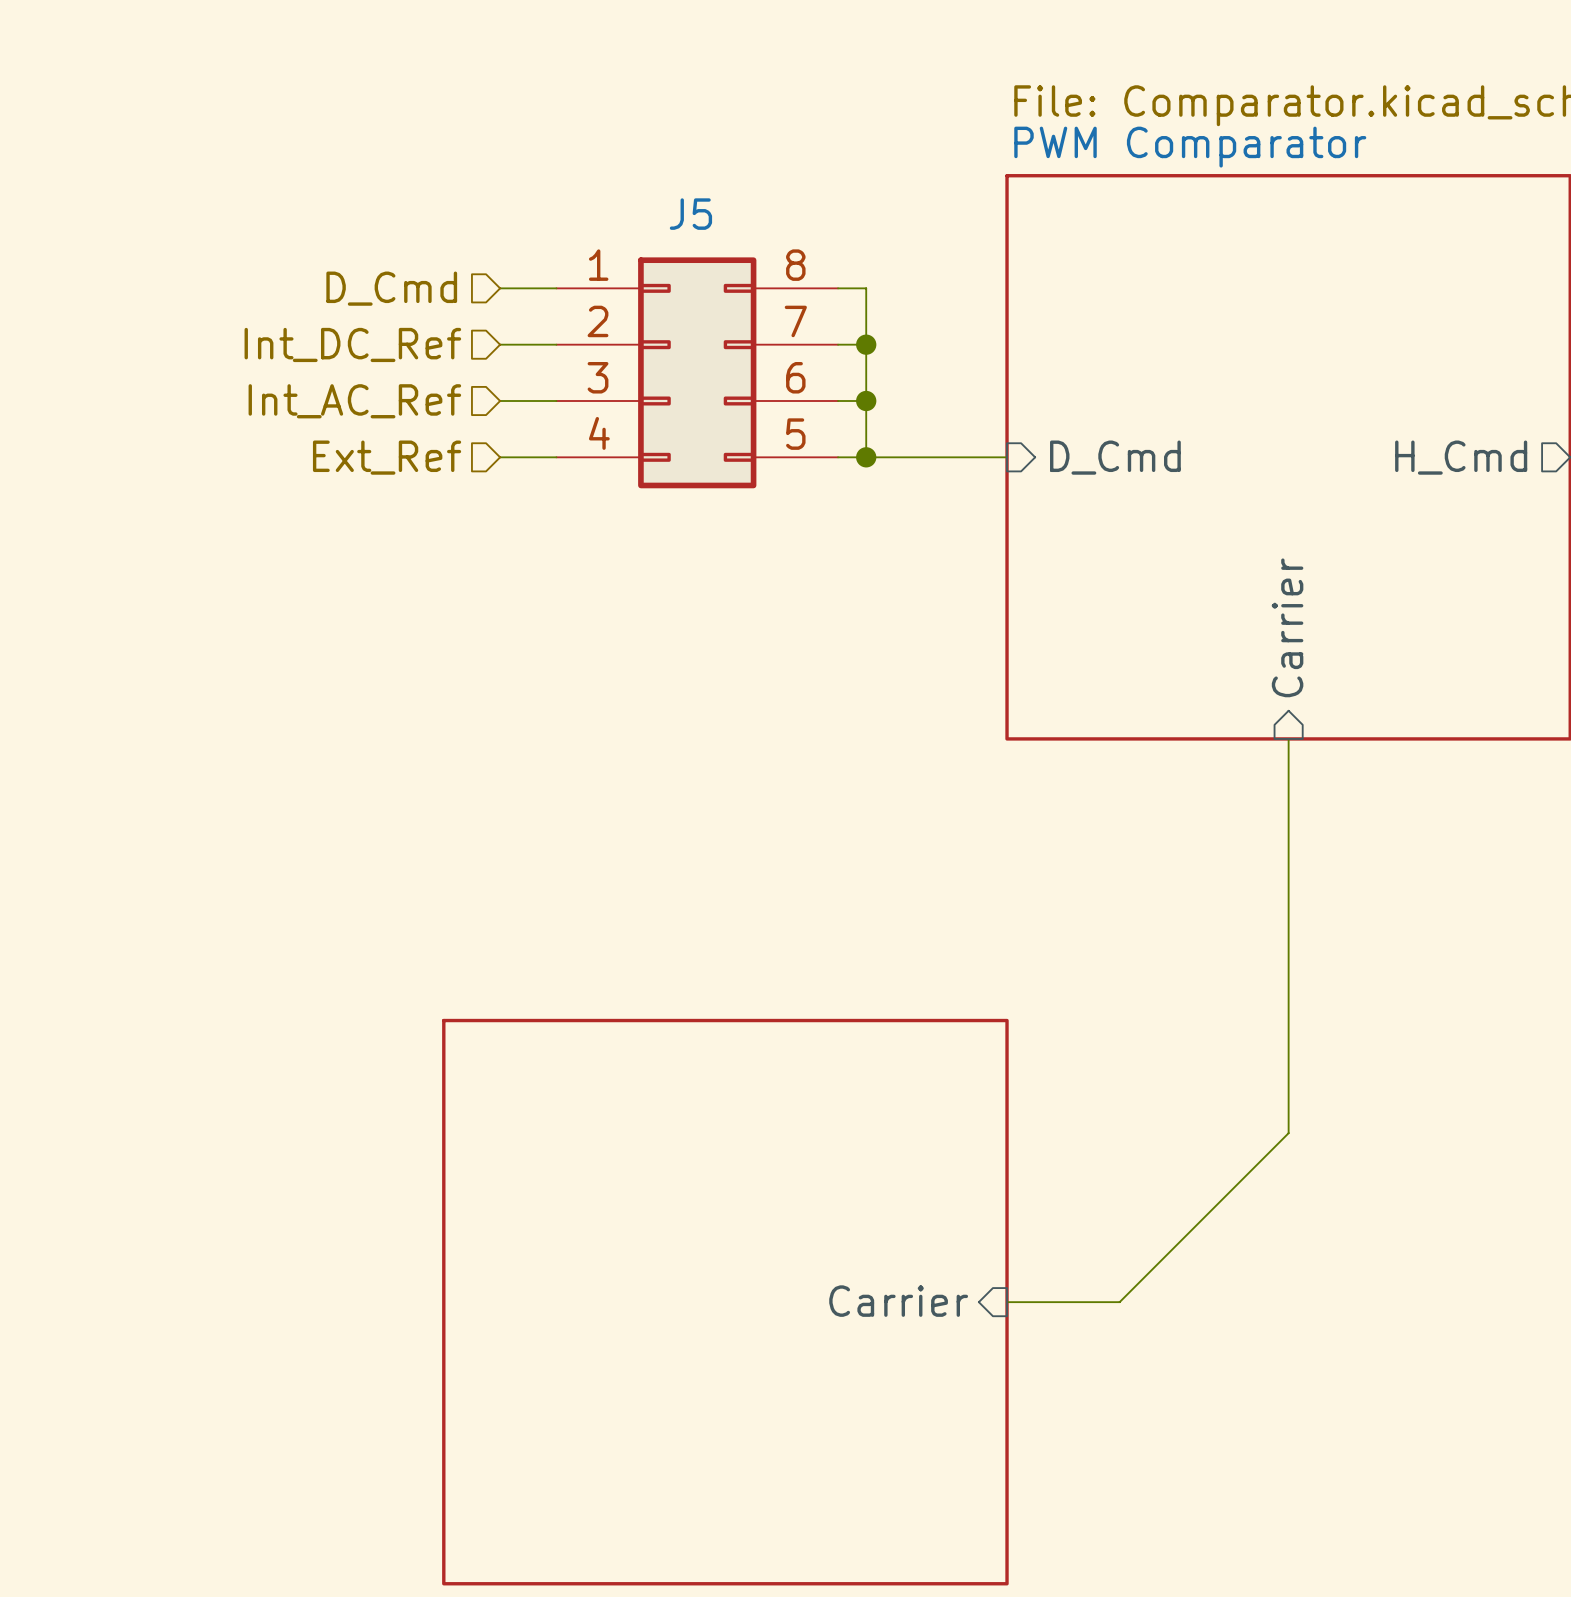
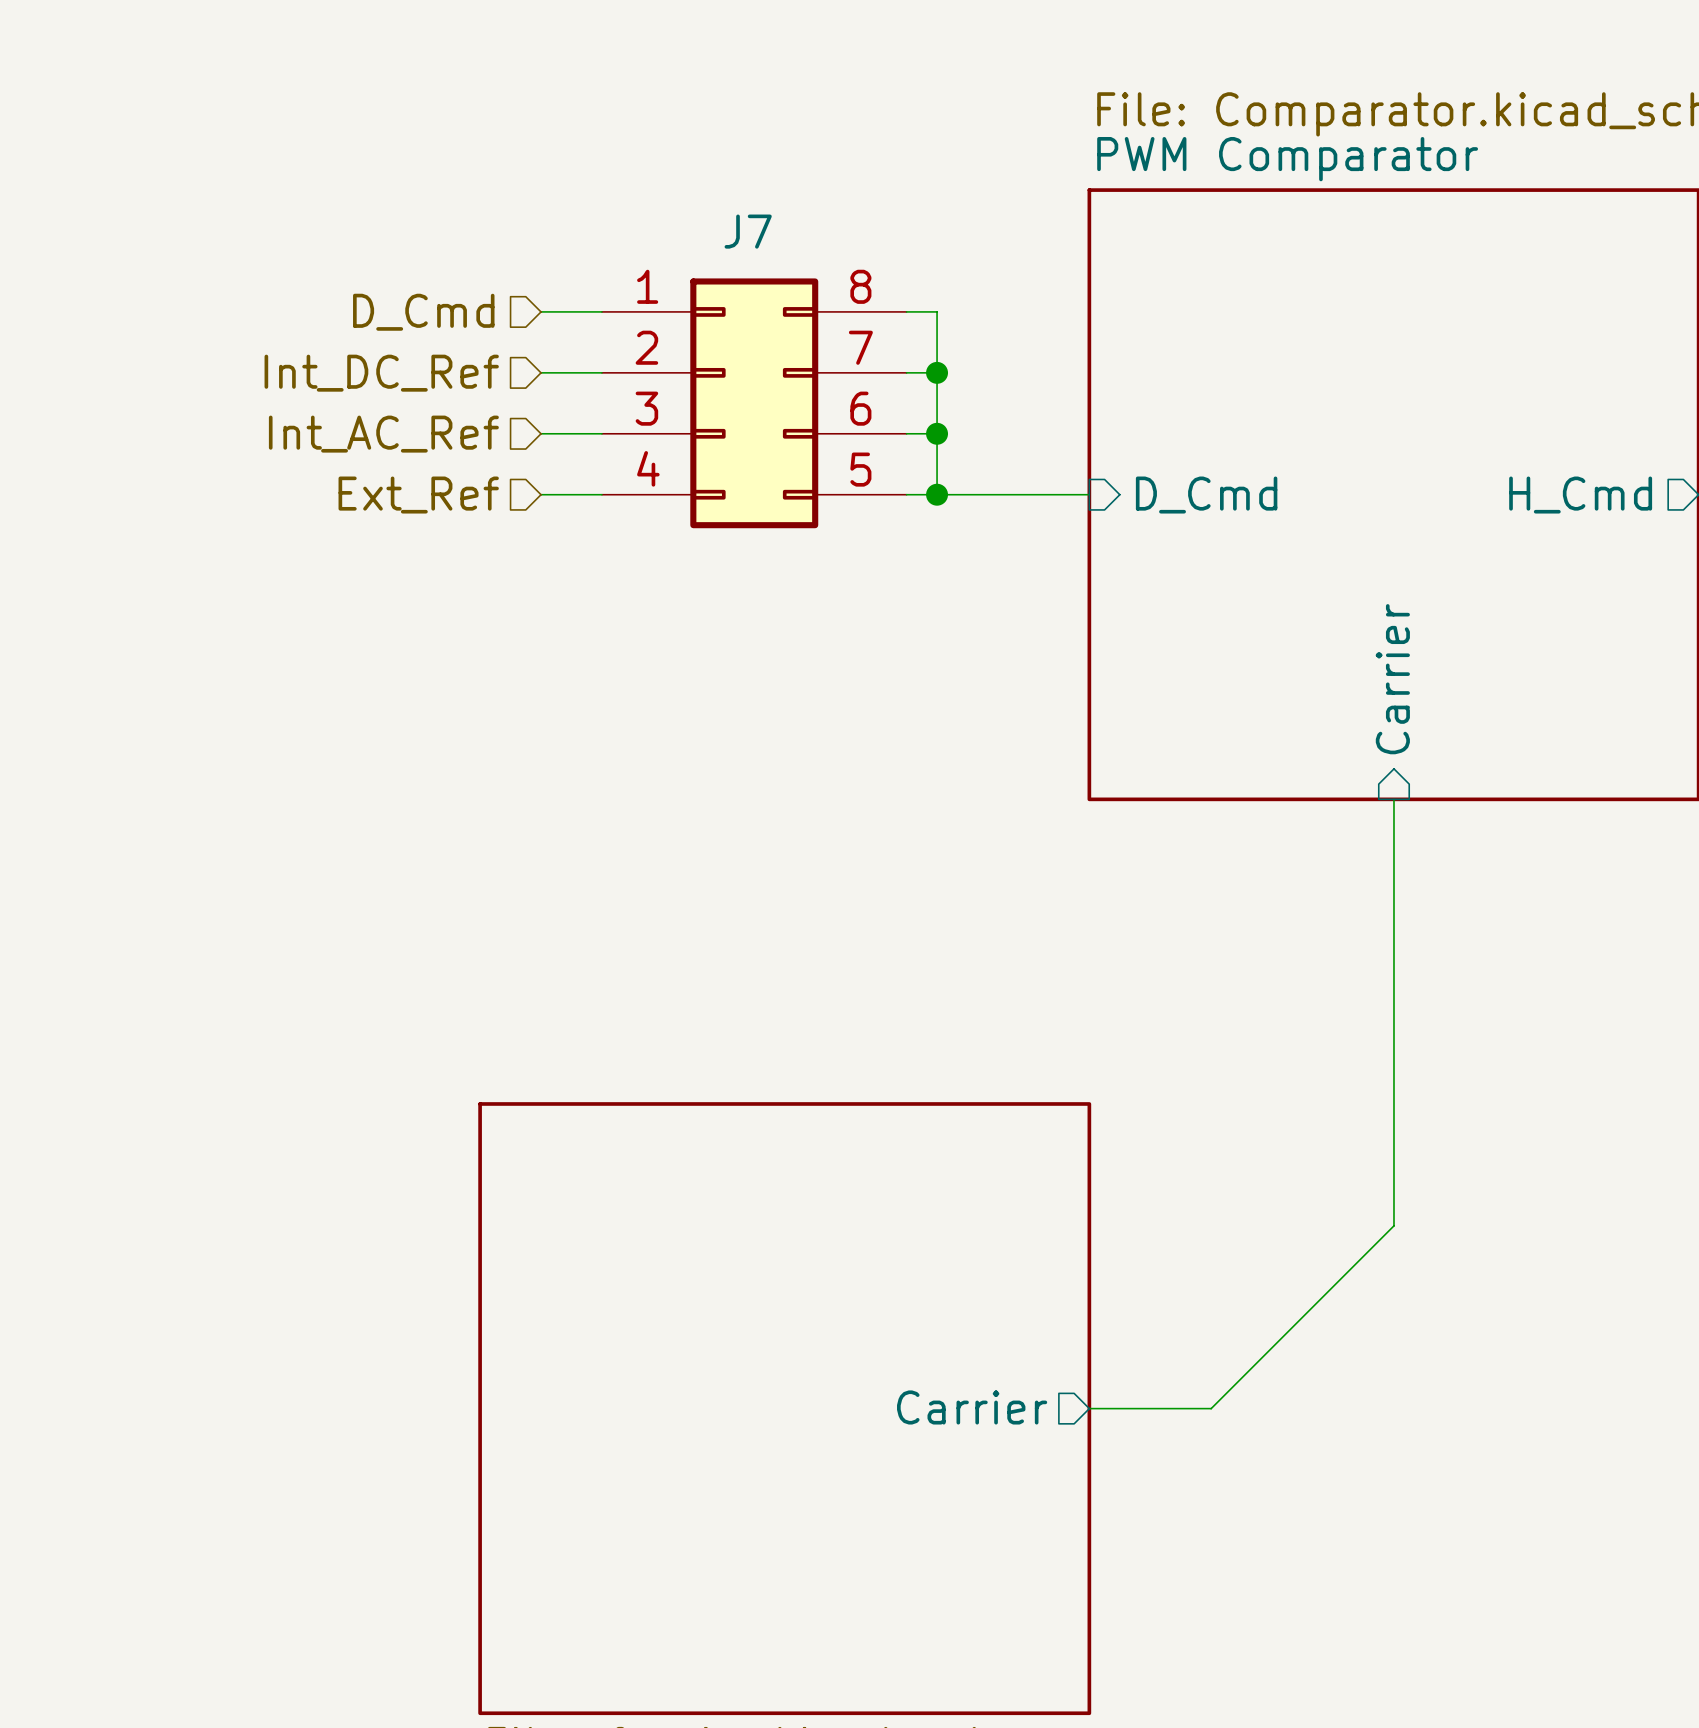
J5 name: J5 (690, 214) -> J7 (748, 231)
sheet pin shape: input (898, 1301) -> output (972, 1407)

